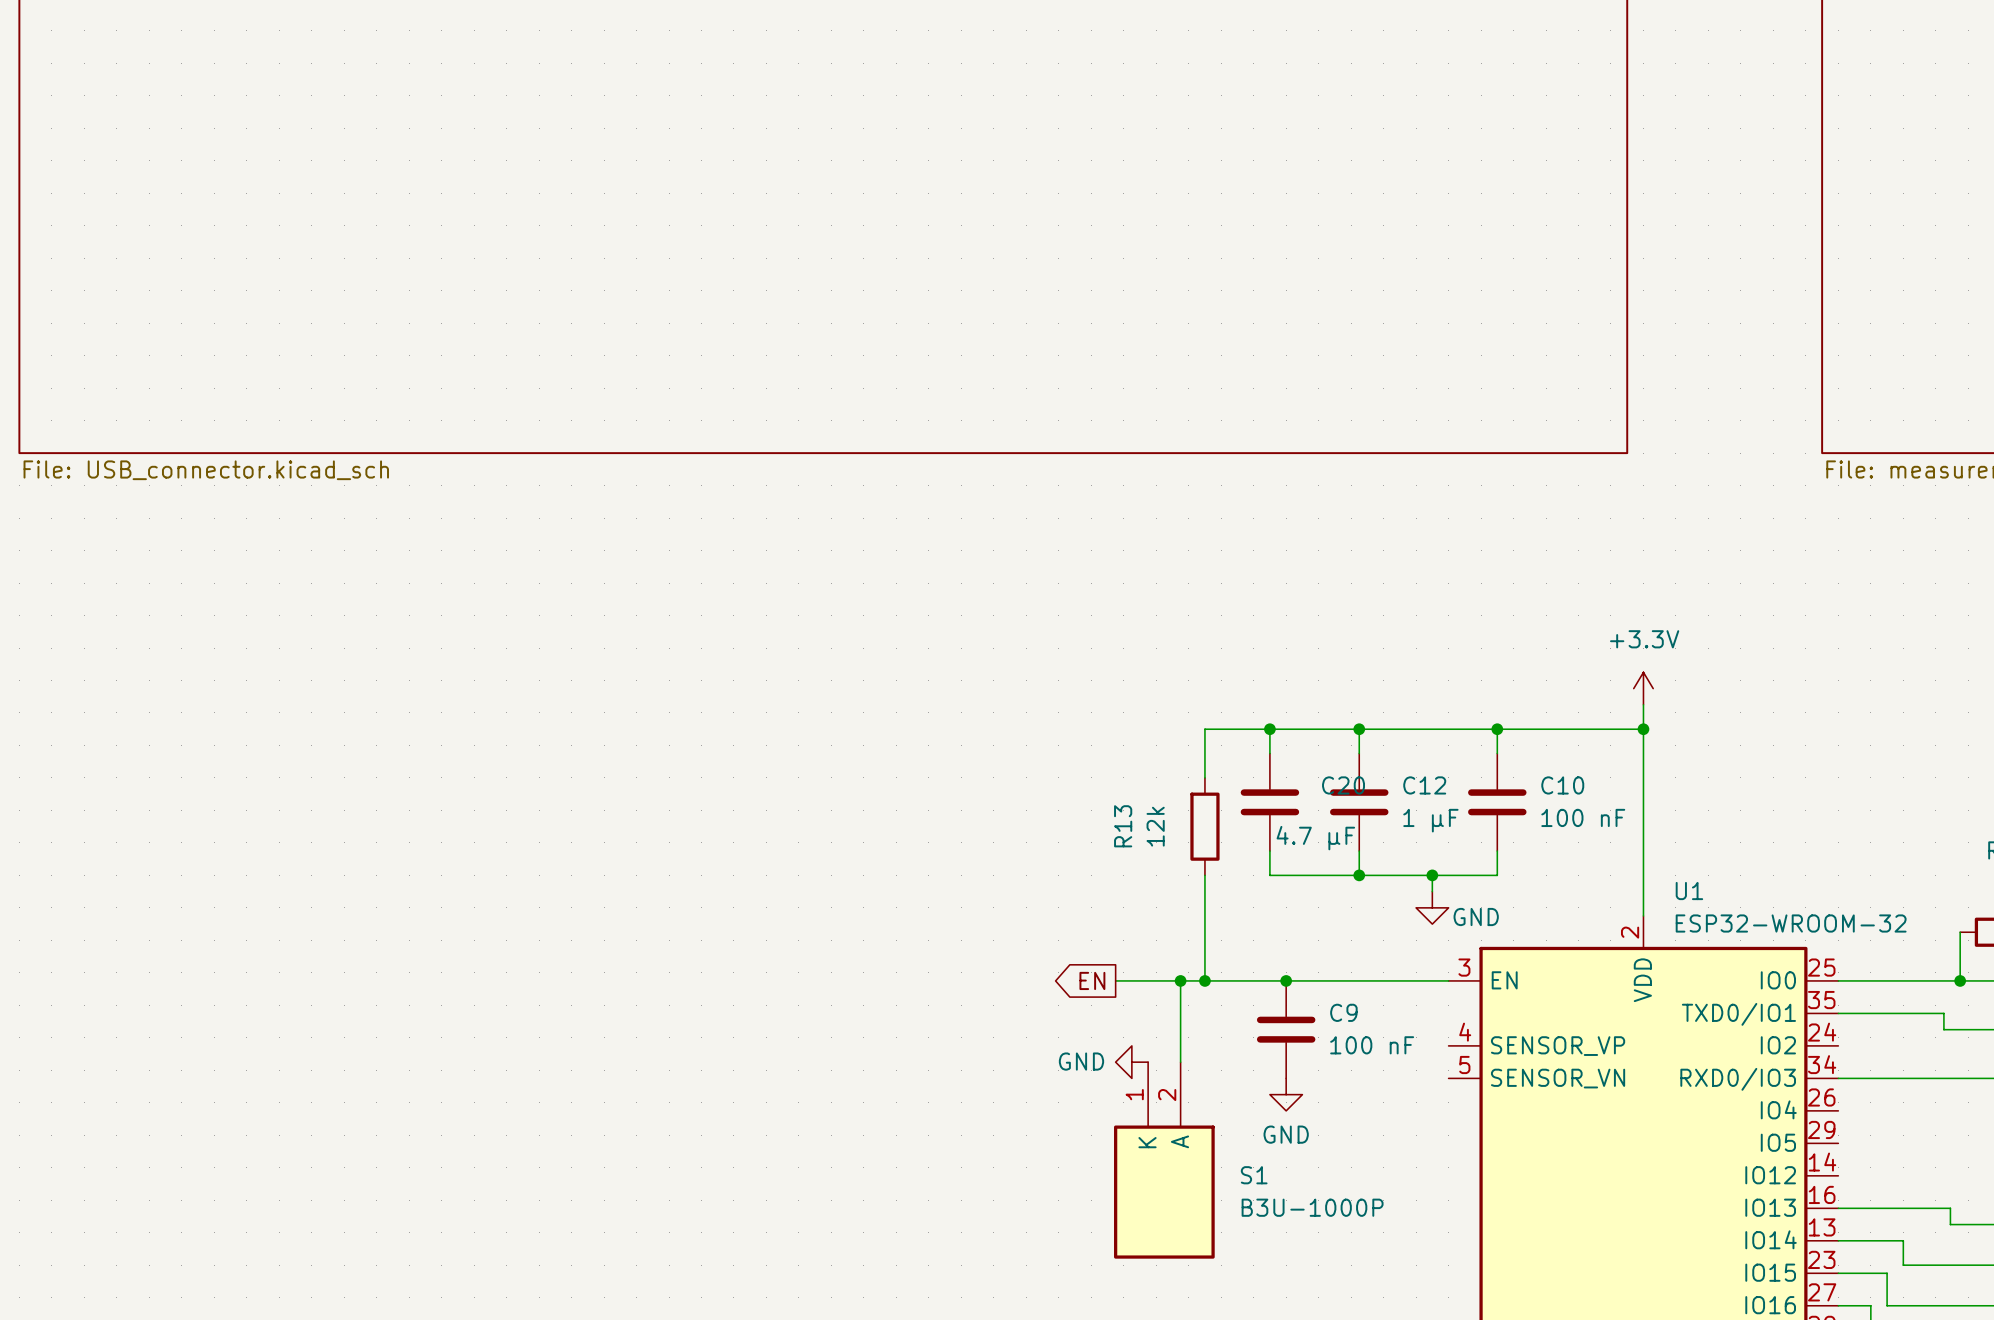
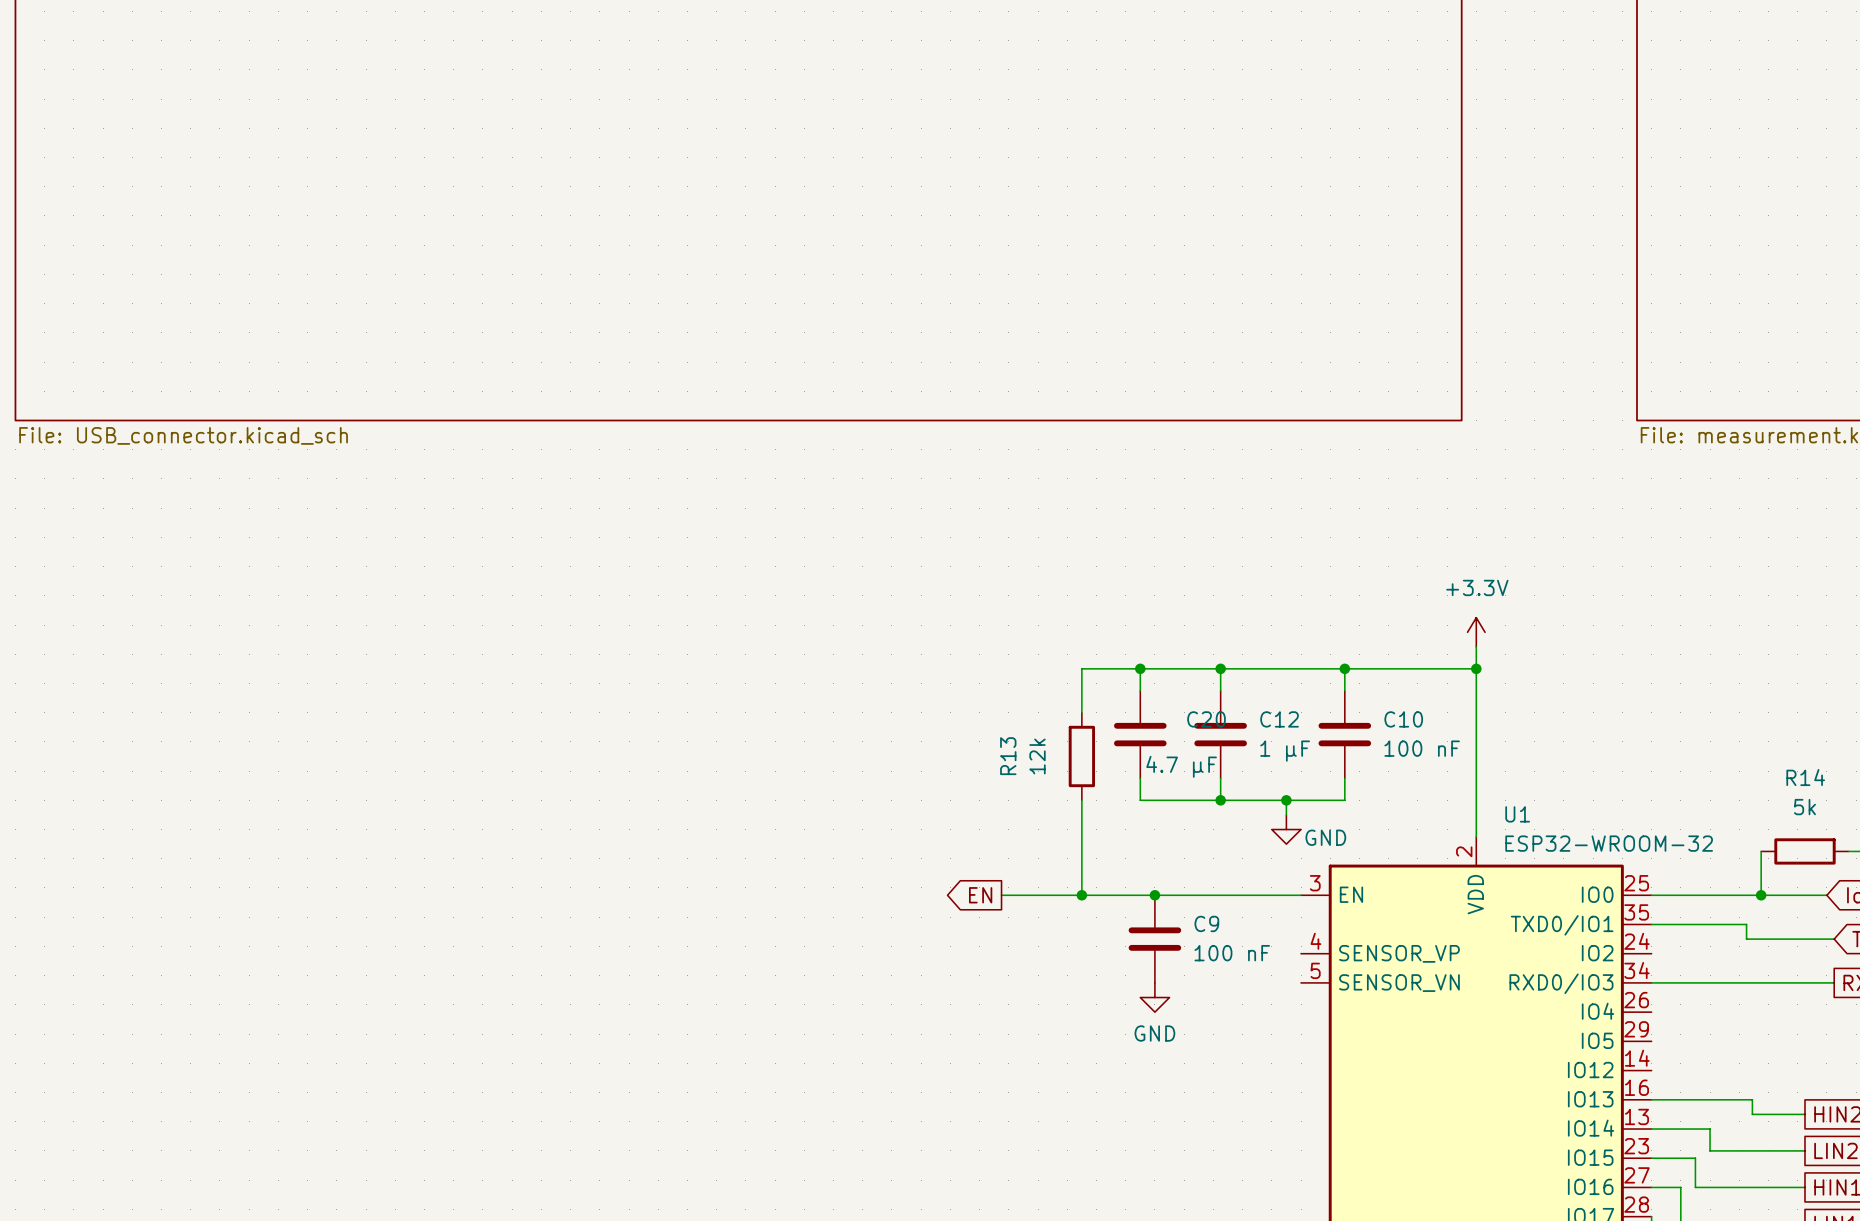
wire: (1180, 980) (1180, 1062) -> none
junction: (1180, 980) -> none
power symbol: GND (1131, 1062) -> none
S1: B3U-1000P (1164, 1160) -> none

